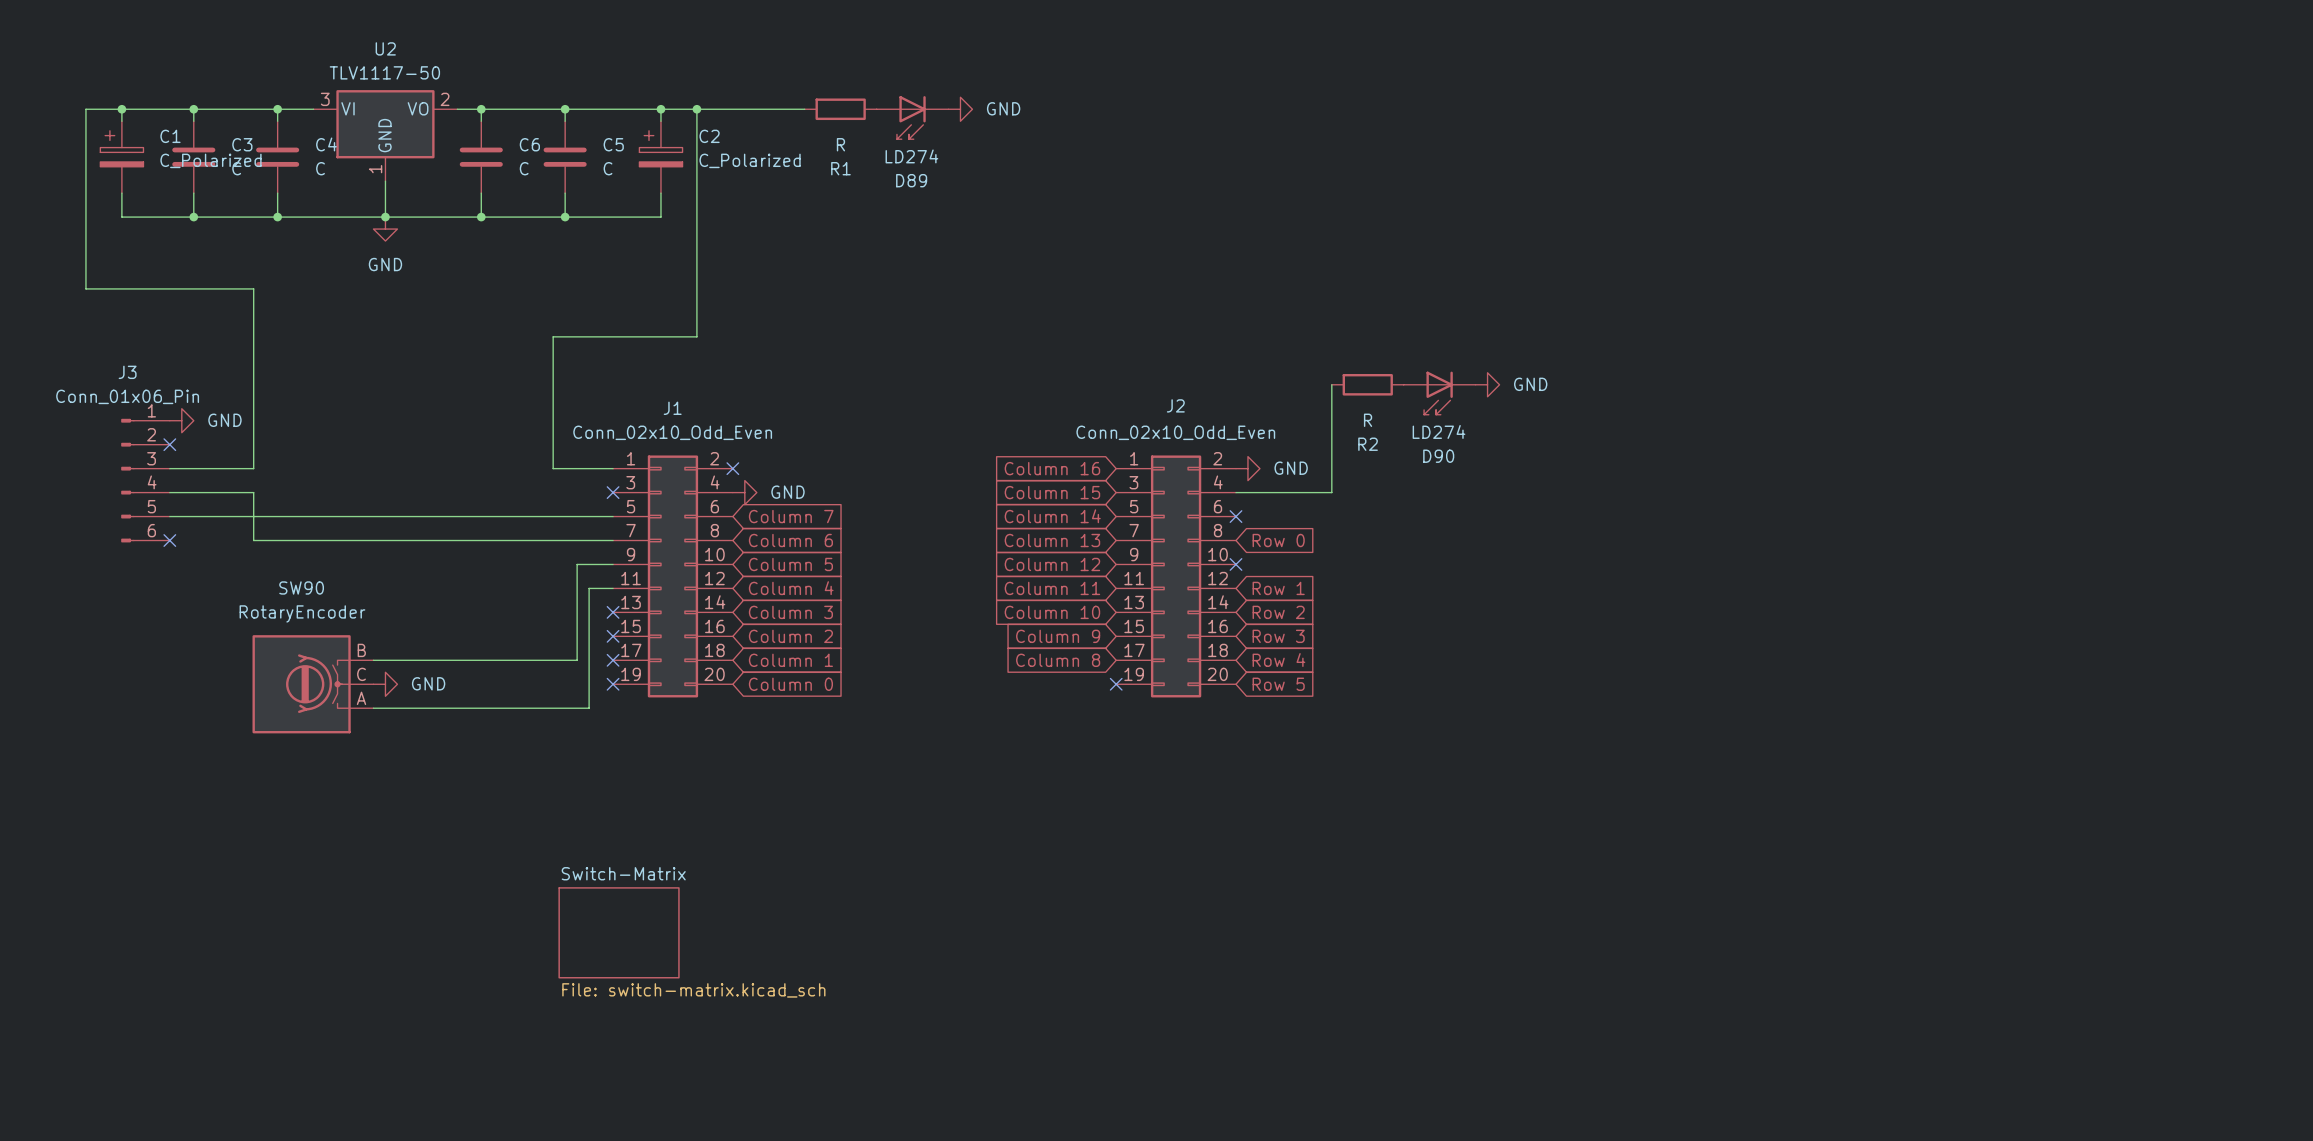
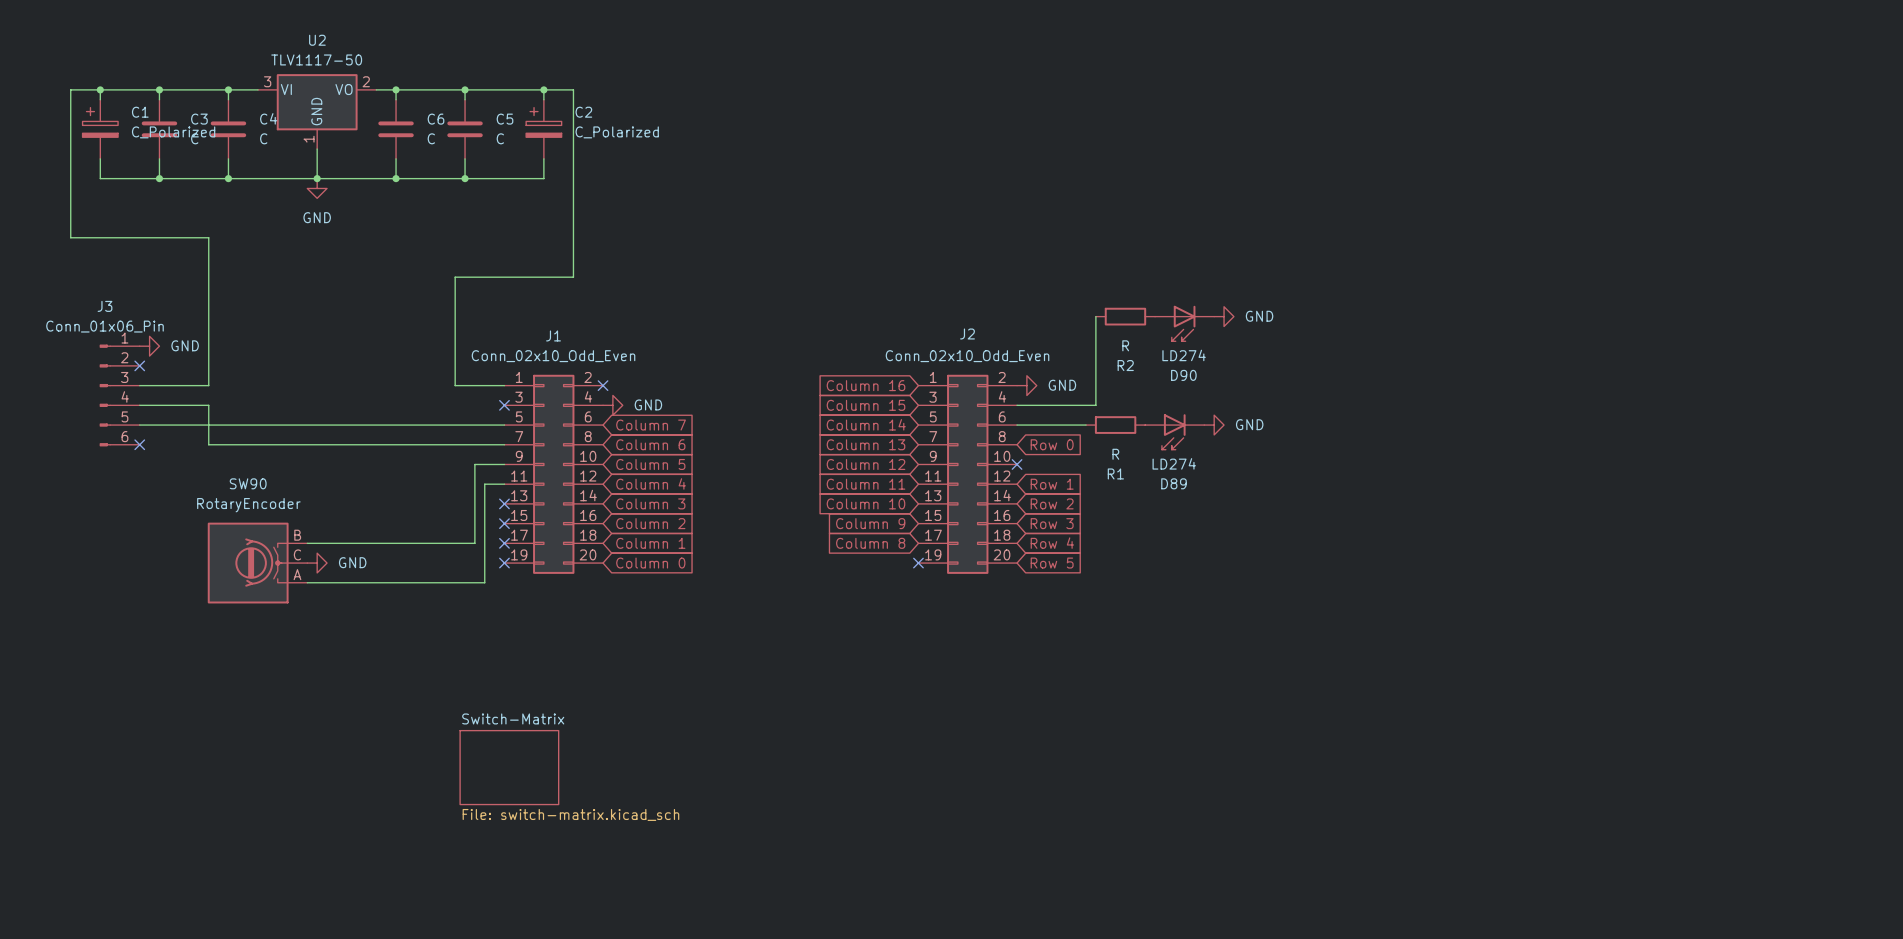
wire: (696, 109) (804, 109) -> none
junction: (696, 109) -> none
R1 position: (840, 109) -> (1115, 425)
power symbol: GND (960, 109) -> none
D89 position: (912, 117) -> (1174, 431)
wire: none -> (1017, 425) (1086, 425)
no-connect mark: (1235, 516) -> none
power symbol: none -> GND (1214, 425)

